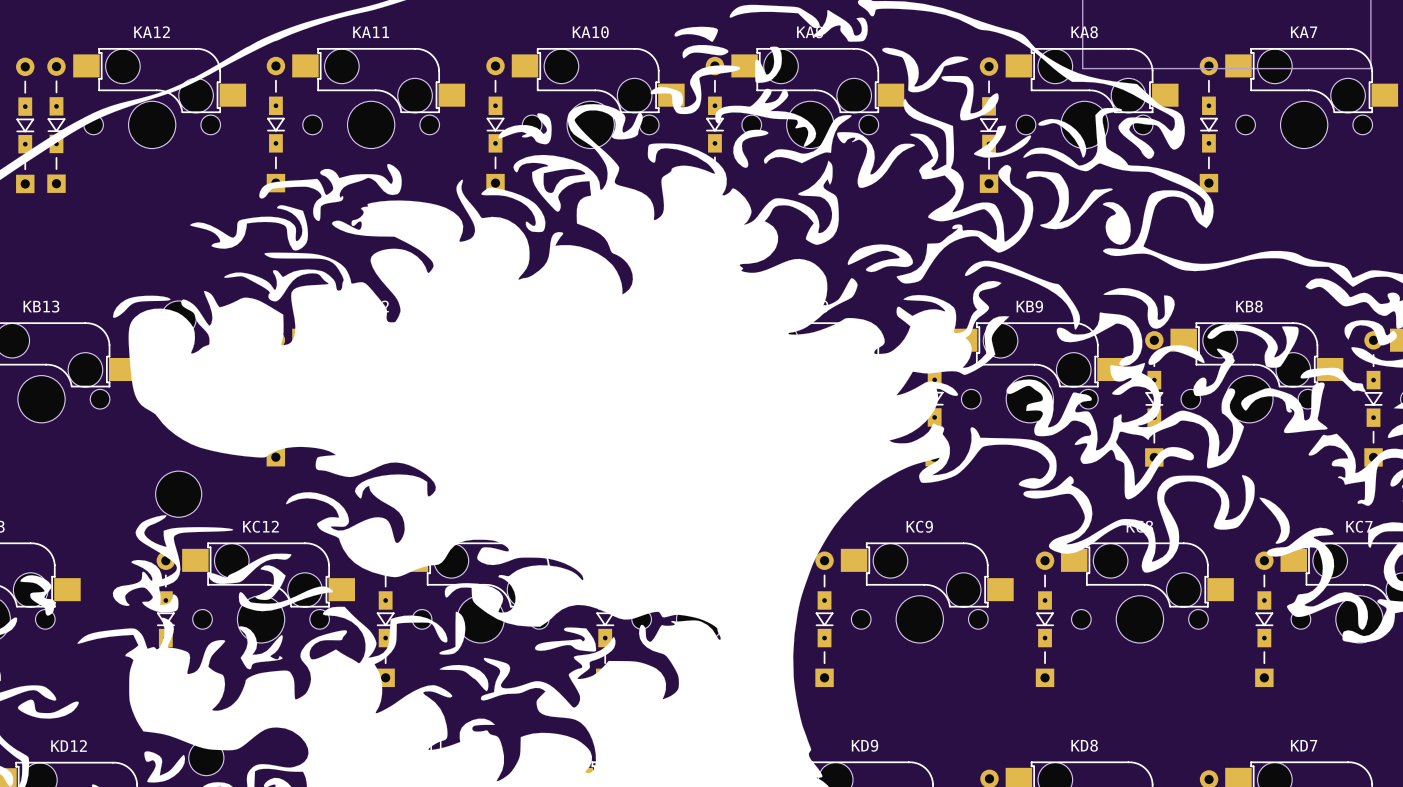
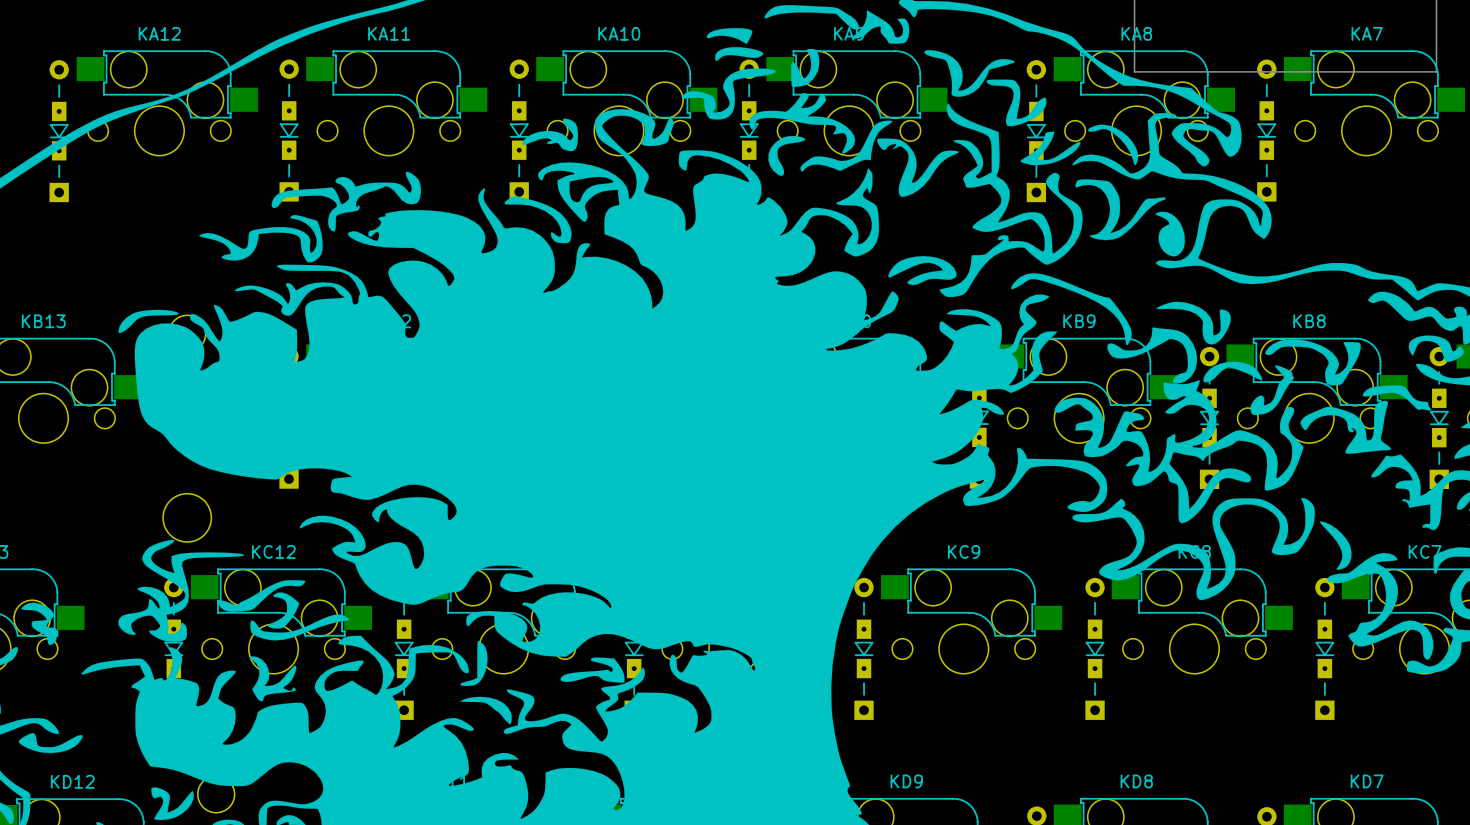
part: (25, 125) -> none

